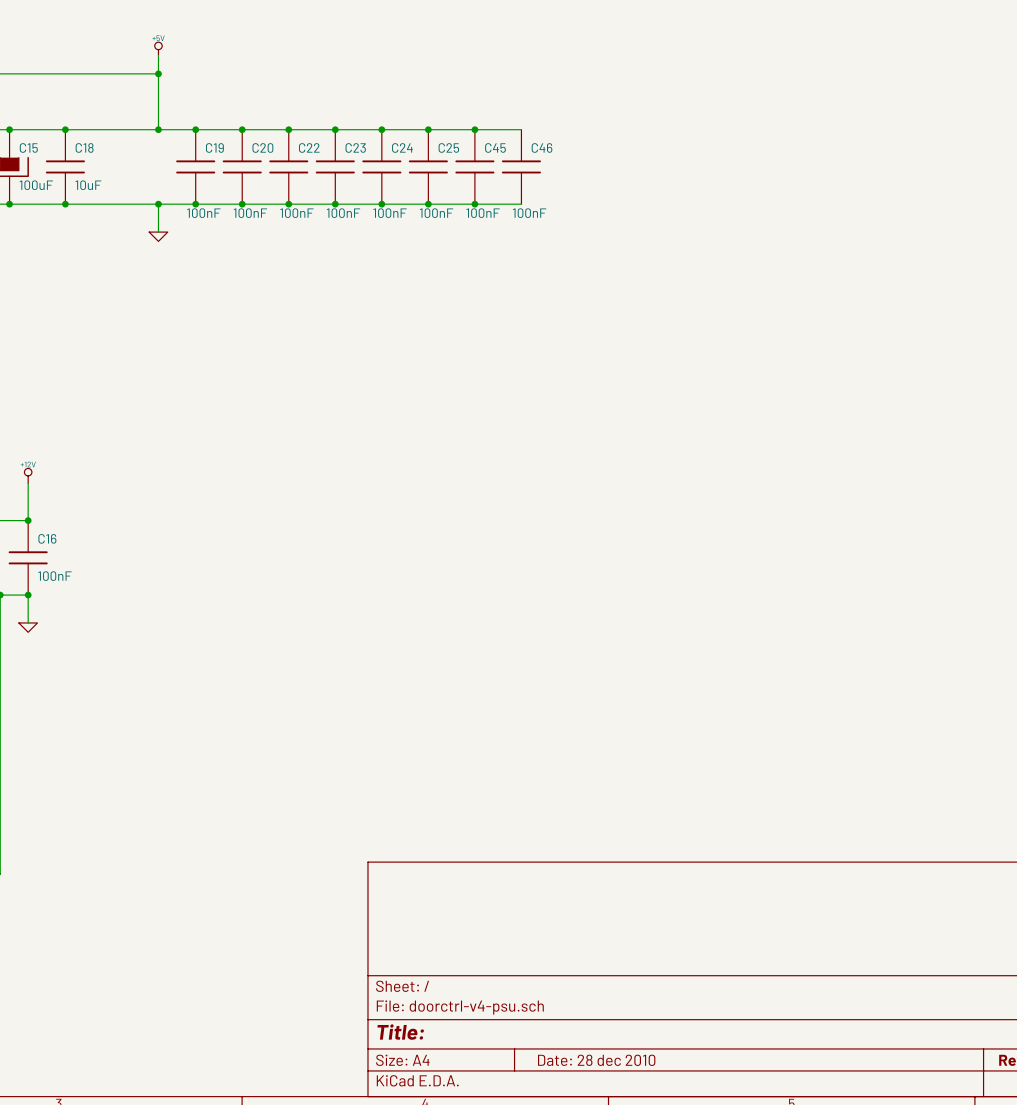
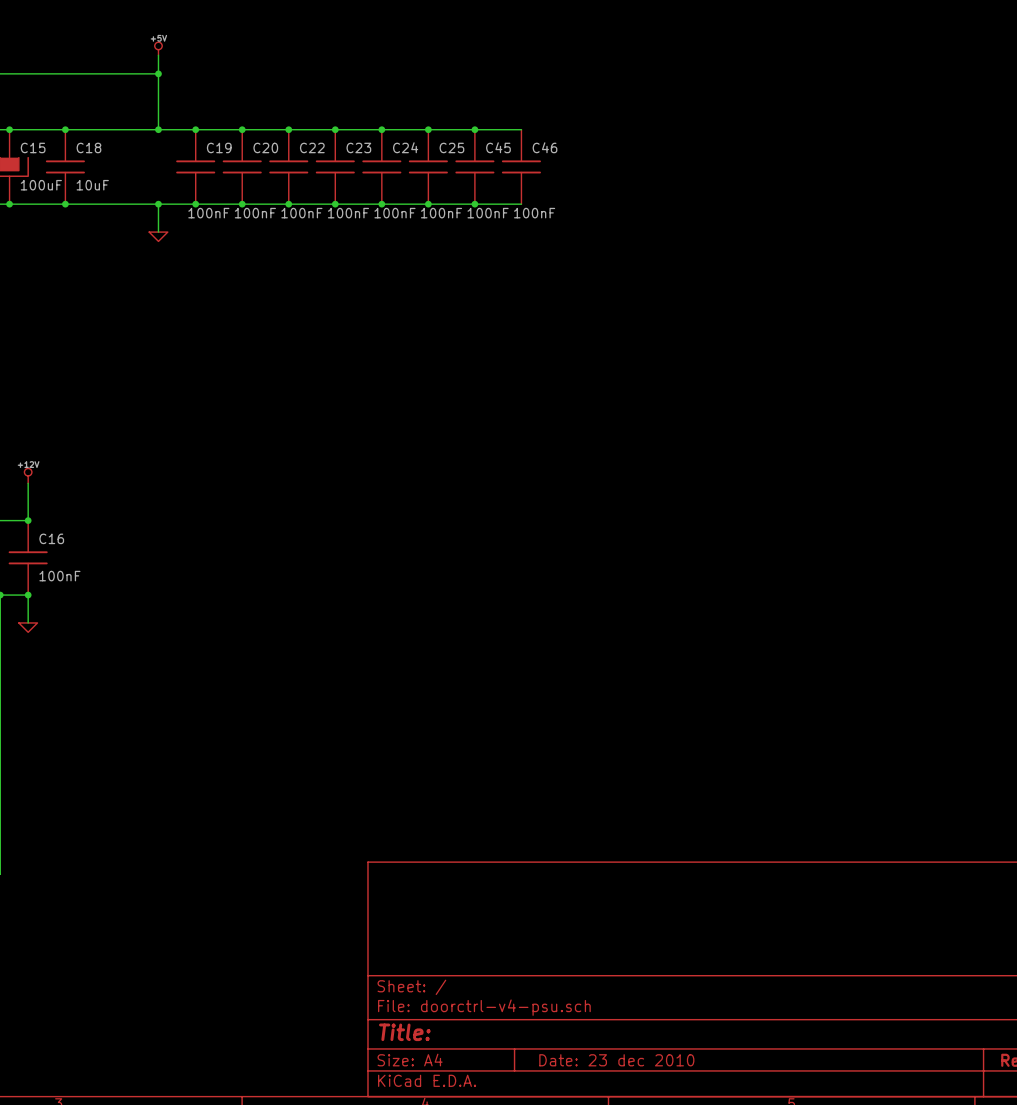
title block: Date: 28 dec 2010 (596, 1060) -> Date: 23 dec 2010 (616, 1060)

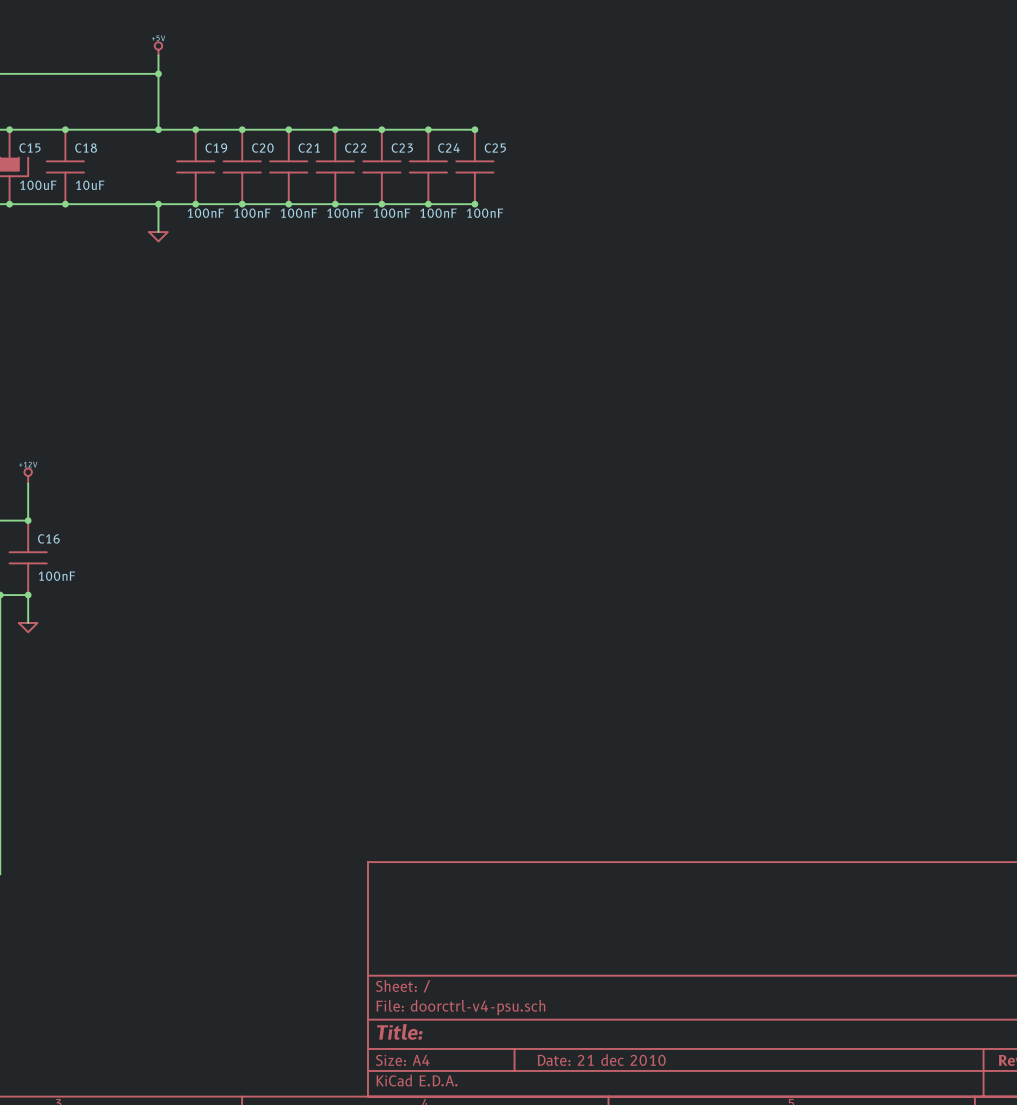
wire: (474, 129) (521, 129) -> none
C22 name: C22 (312, 147) -> C21 (309, 148)
C23 name: C23 (358, 147) -> C22 (355, 148)
C24 name: C24 (405, 147) -> C23 (402, 148)
C25 name: C25 (451, 147) -> C24 (448, 148)
C45 name: C45 (498, 147) -> C25 (495, 148)
C46: 100nF (521, 166) -> none
wire: (474, 204) (521, 204) -> none
title block: Date: 23 dec 2010 (616, 1060) -> Date: 21 dec 2010 (601, 1059)

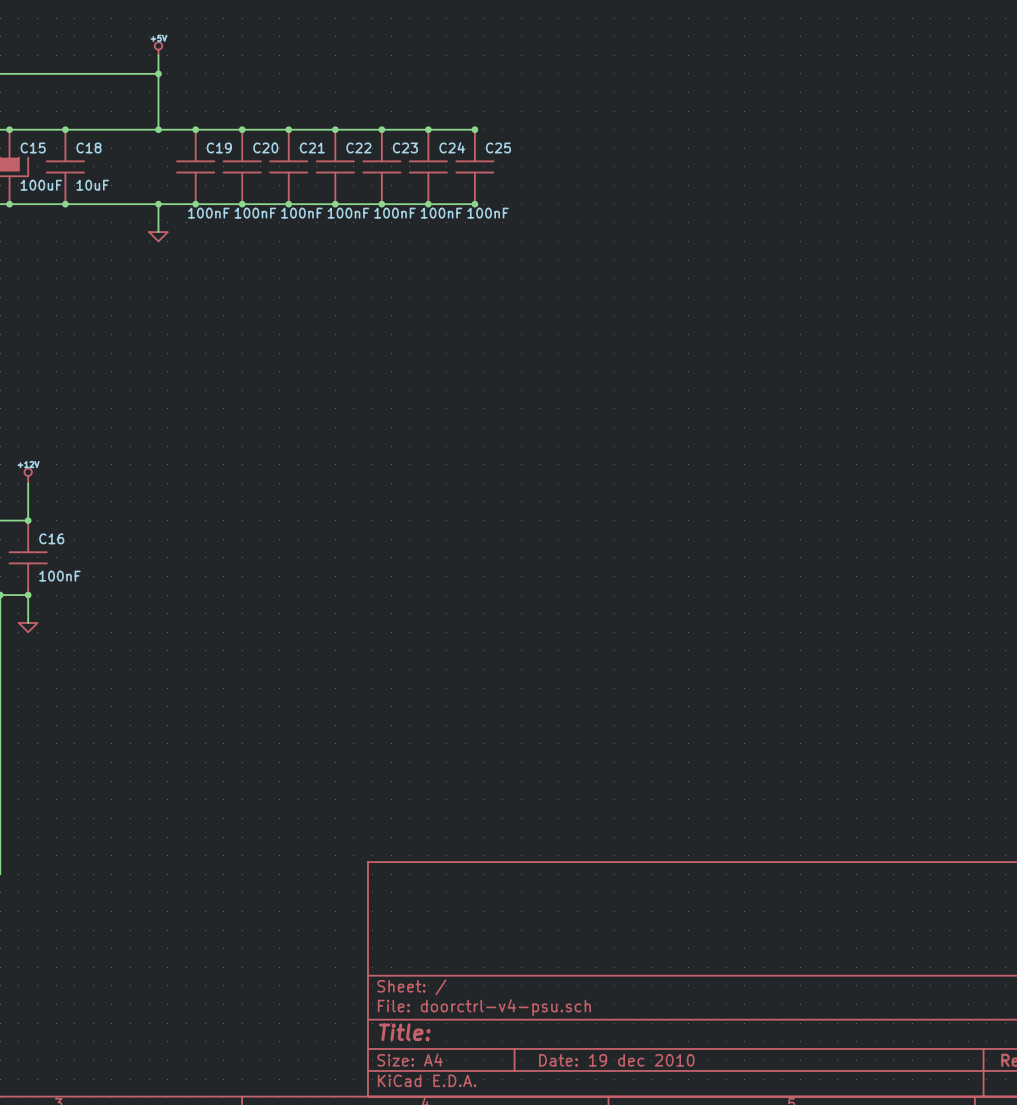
title block: Date: 21 dec 2010 (601, 1059) -> Date: 19 dec 2010 (616, 1060)

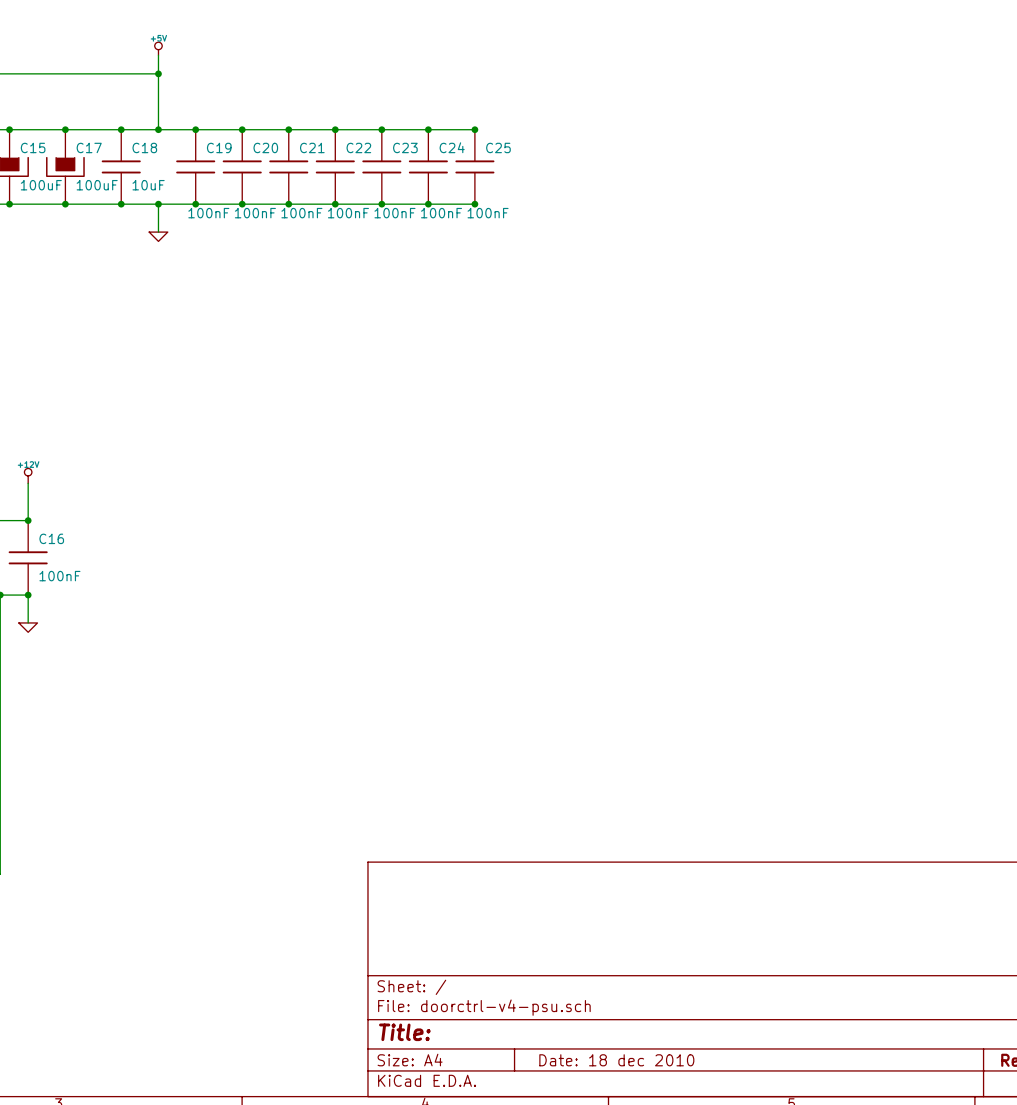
junction: none -> (121, 129)
C18 position: (65, 166) -> (121, 166)
C17: none -> 100uF (65, 166)
junction: none -> (121, 204)
title block: Date: 19 dec 2010 (616, 1060) -> Date: 18 dec 2010 (616, 1060)

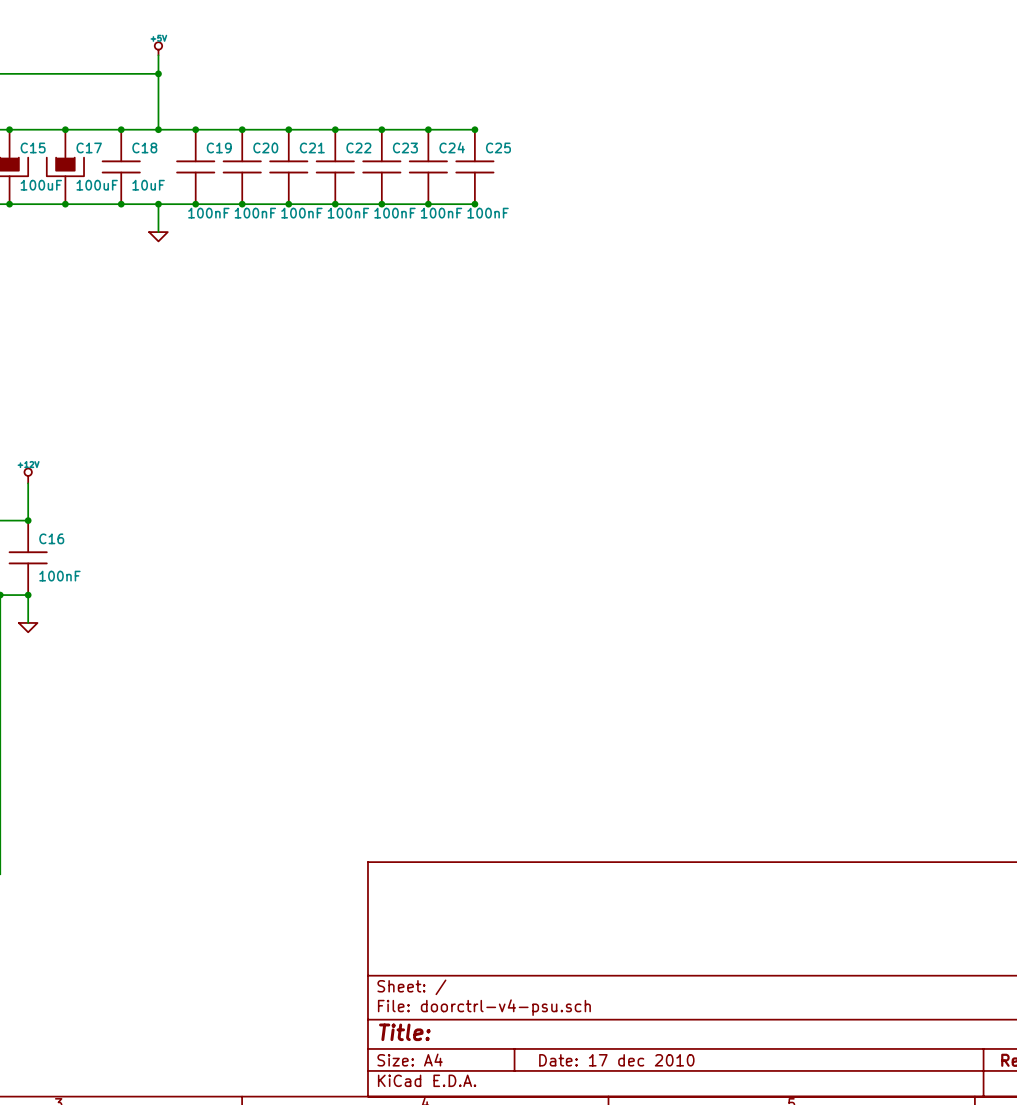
title block: Date: 18 dec 2010 (616, 1060) -> Date: 17 dec 2010 (616, 1060)

